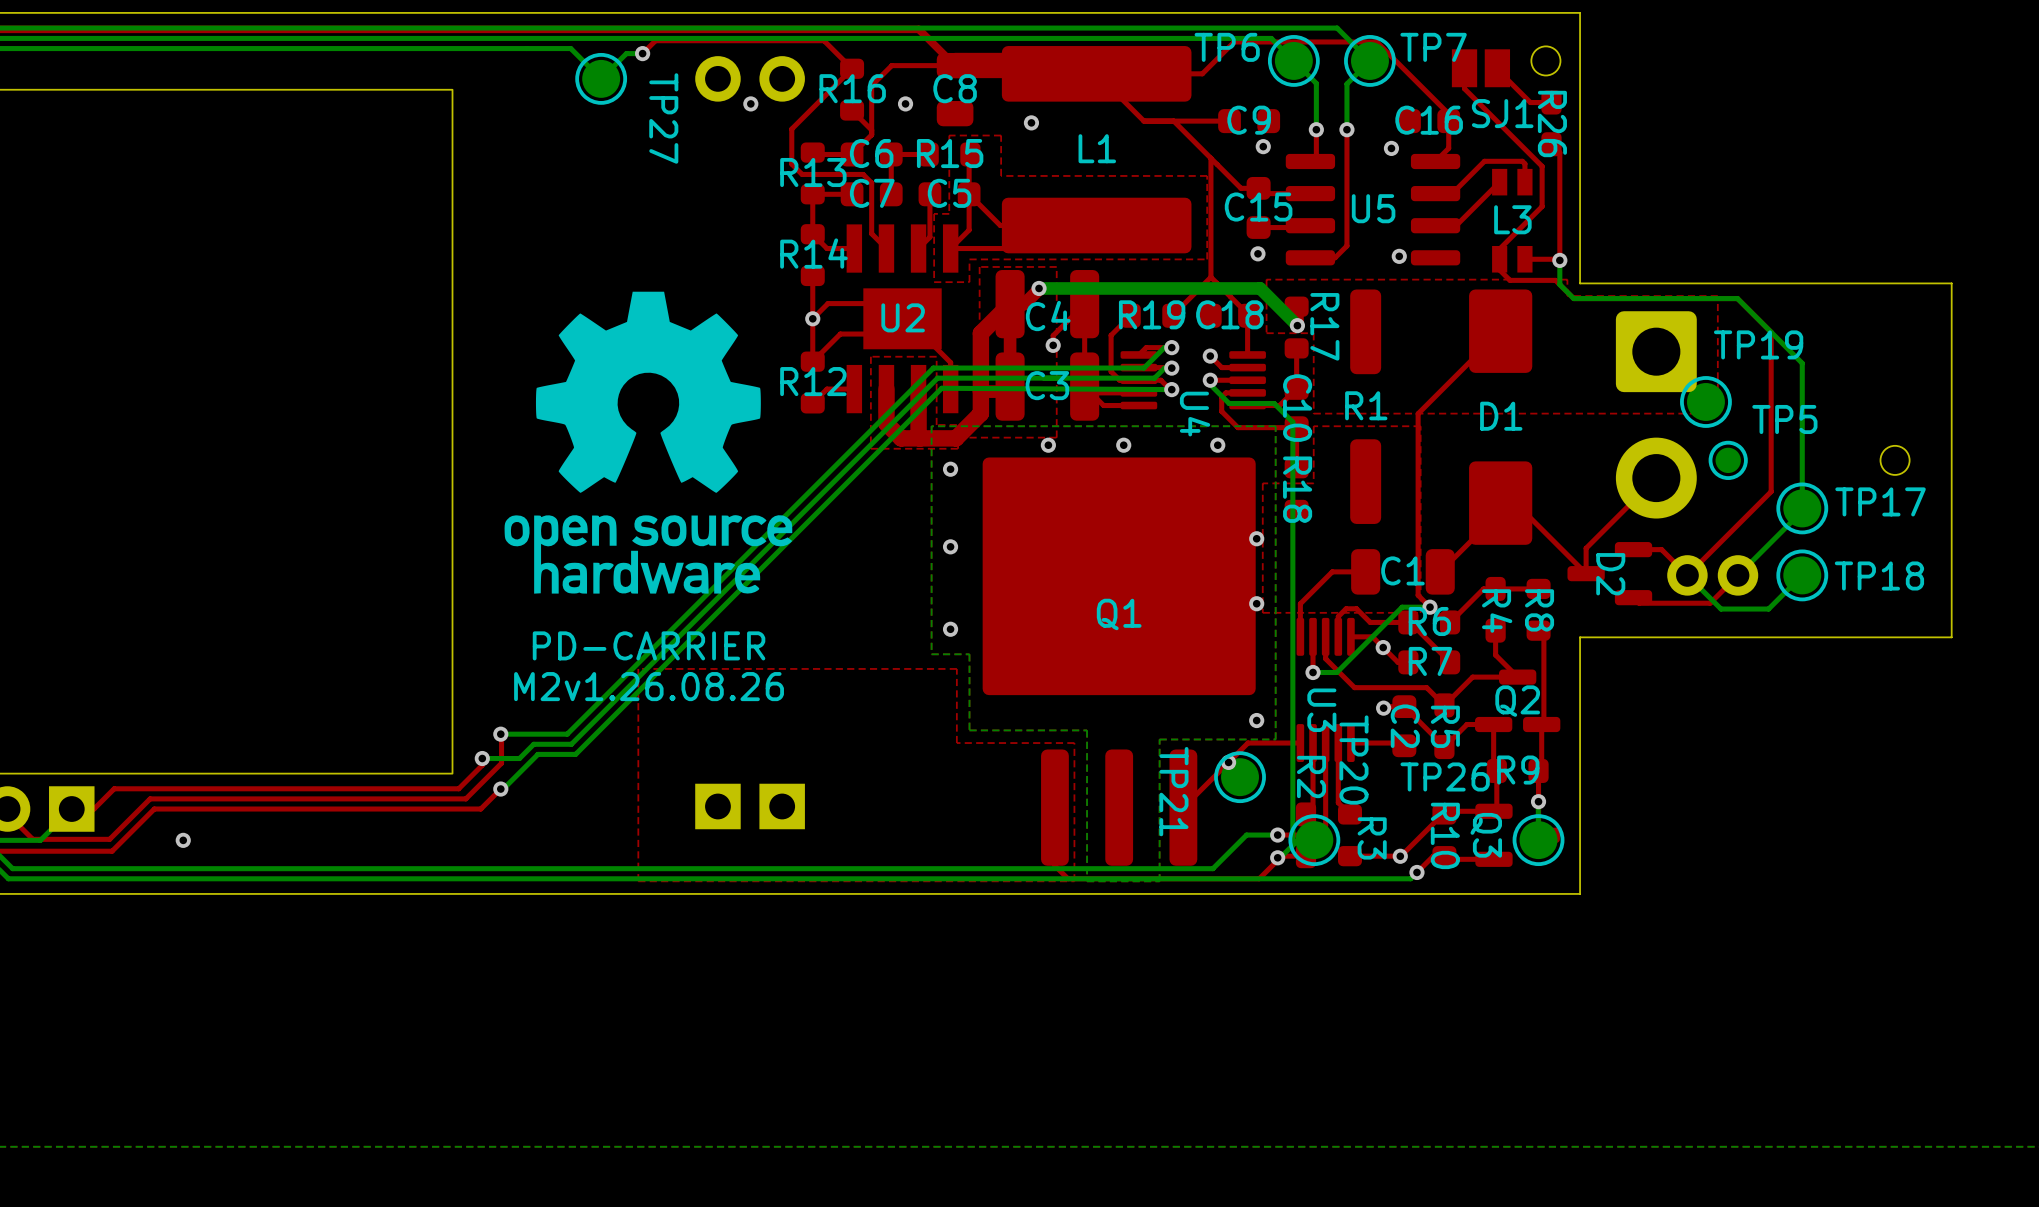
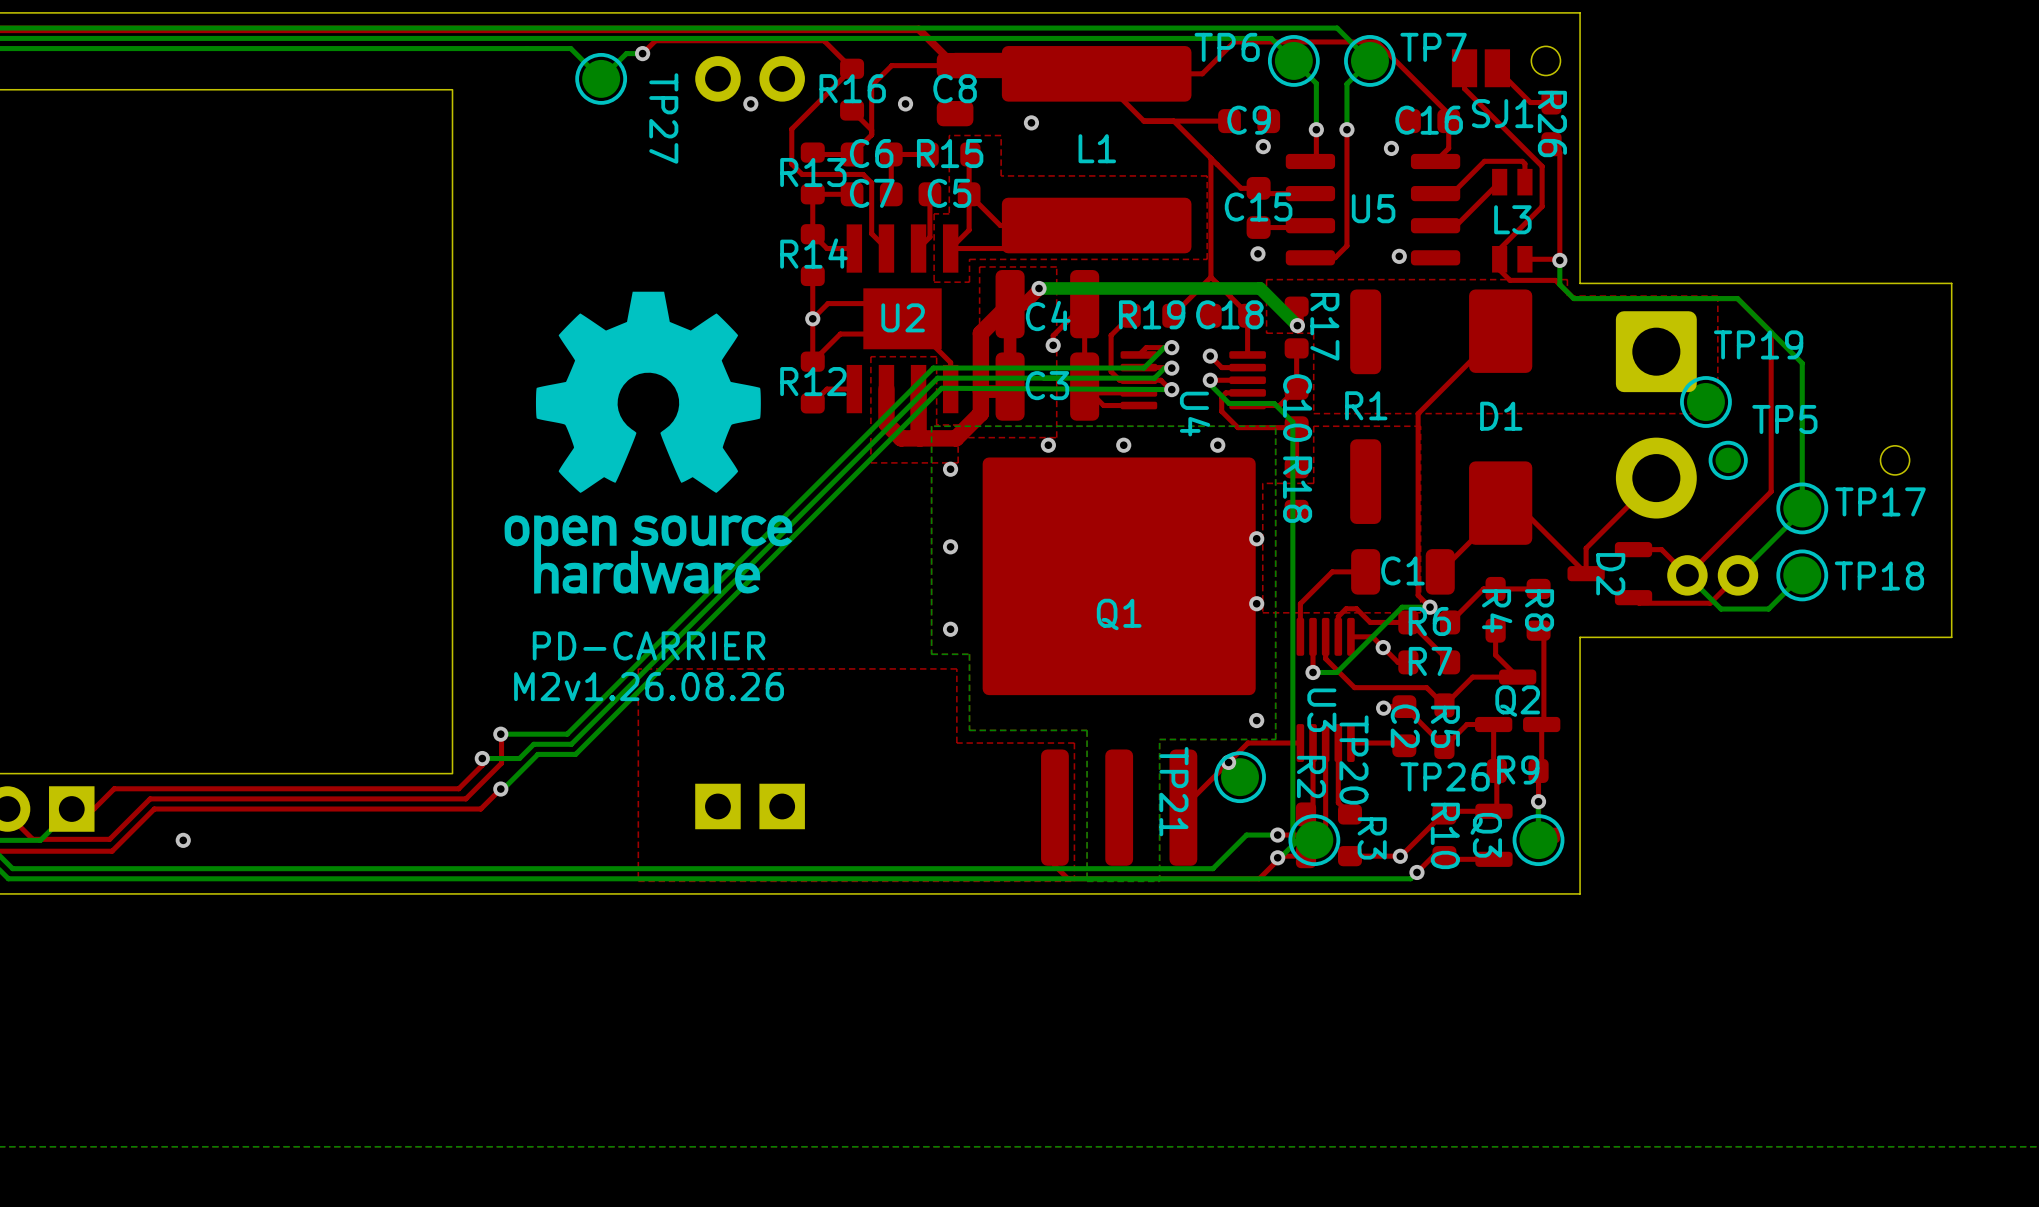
top zone outline: (958, 448) (870, 448) -> (958, 448) (958, 462) (870, 462) (870, 448)

